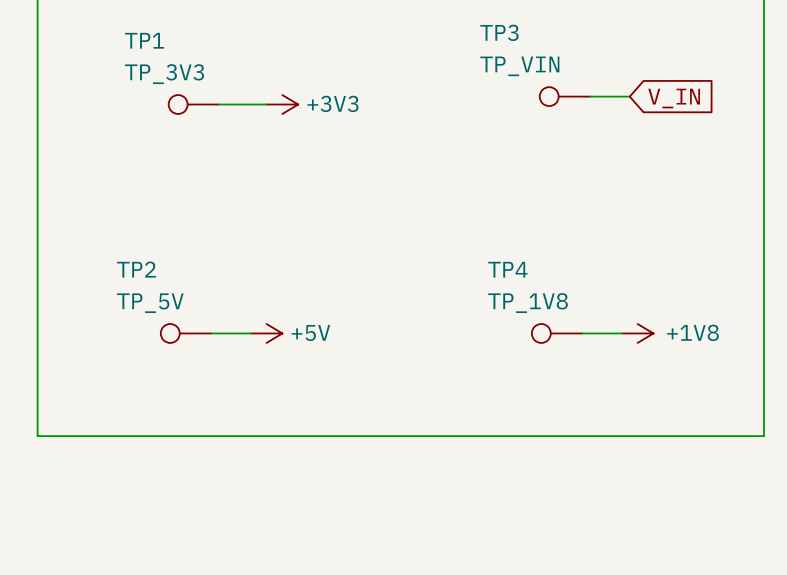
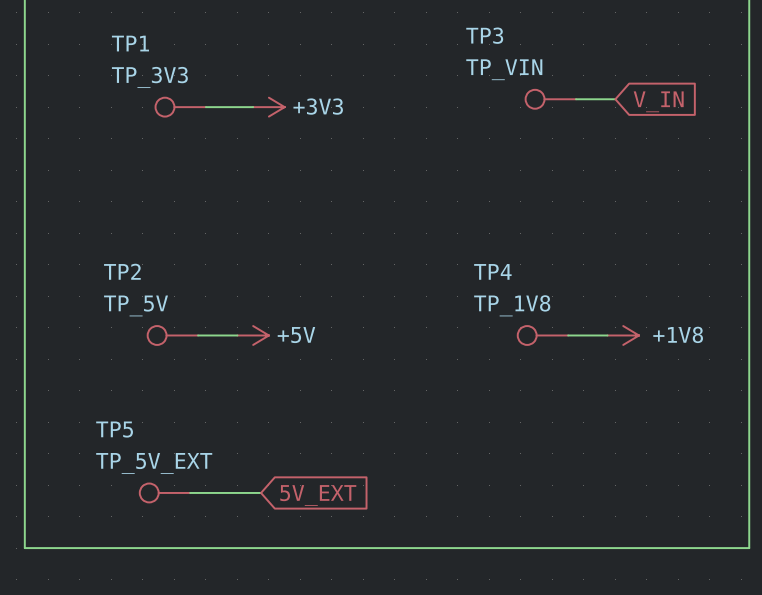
wire: (37, 436) (763, 436) -> (24, 437) (24, 548) (749, 548) (749, 437)
TP5: none -> TP_5V_EXT (164, 492)
wire: none -> (190, 492) (261, 492)
global label: none -> 5V_EXT (318, 495)

